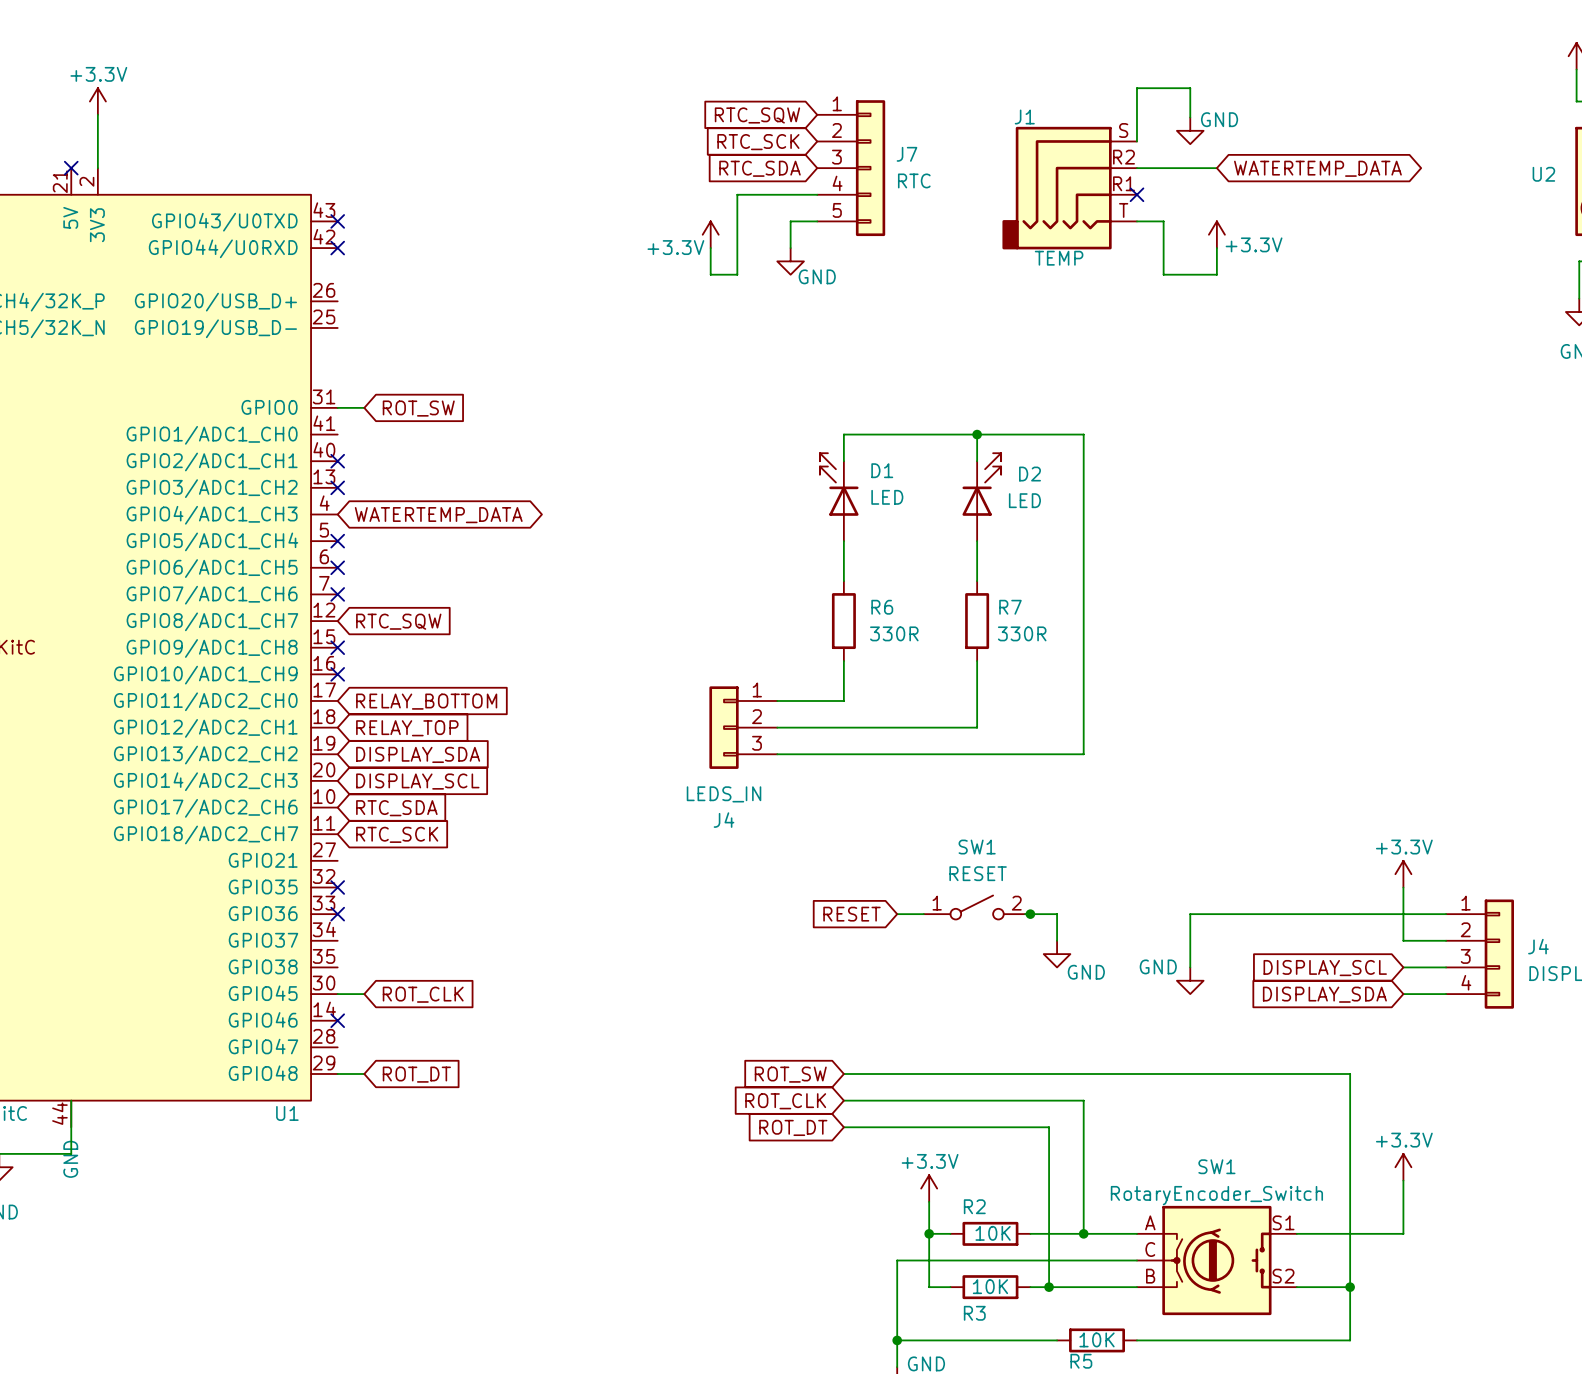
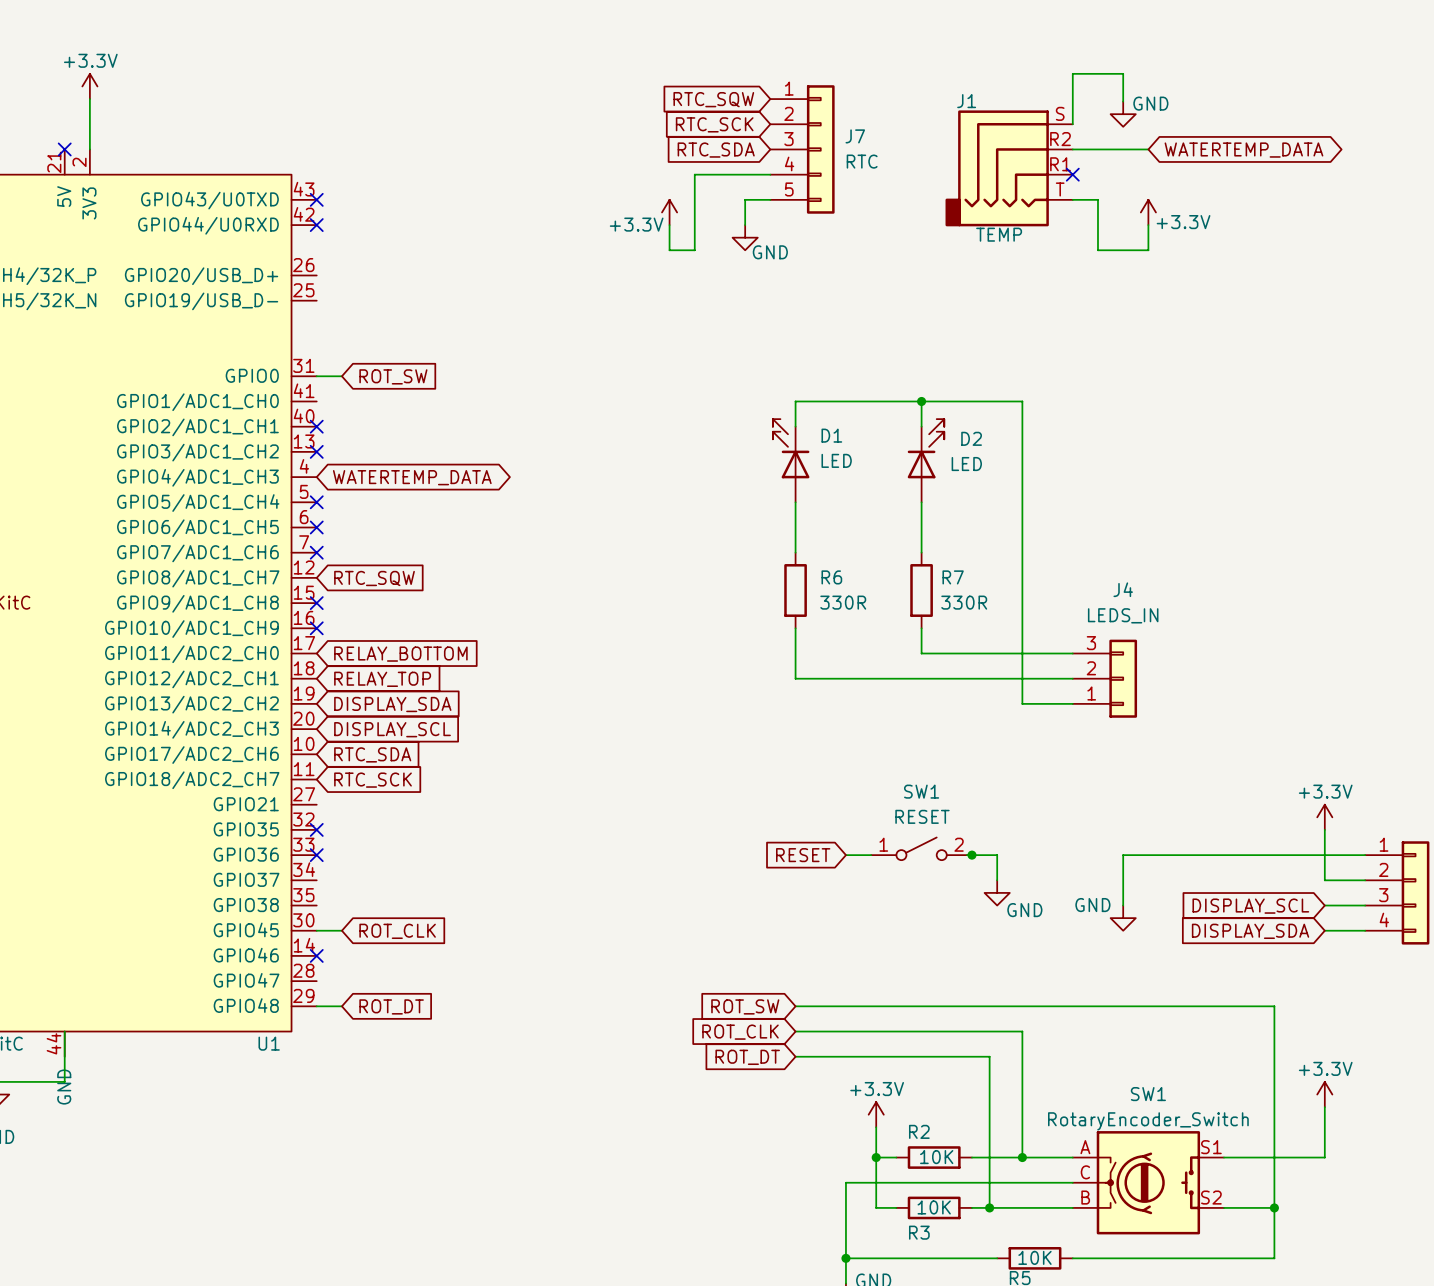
R6 position: (843, 621) -> (795, 590)
R7 position: (977, 621) -> (921, 590)
wire: (777, 700) (843, 700) -> (795, 678) (795, 653)
wire: (977, 700) (977, 727) -> (921, 653) (1072, 653)
J4: LEDS_IN (743, 727) -> none
wire: (777, 727) (843, 727) -> none
wire: none -> (921, 678) (1072, 678)
J4: none -> LEDS_IN (1104, 678)
wire: (777, 754) (1083, 754) -> (1072, 703) (1022, 703)

